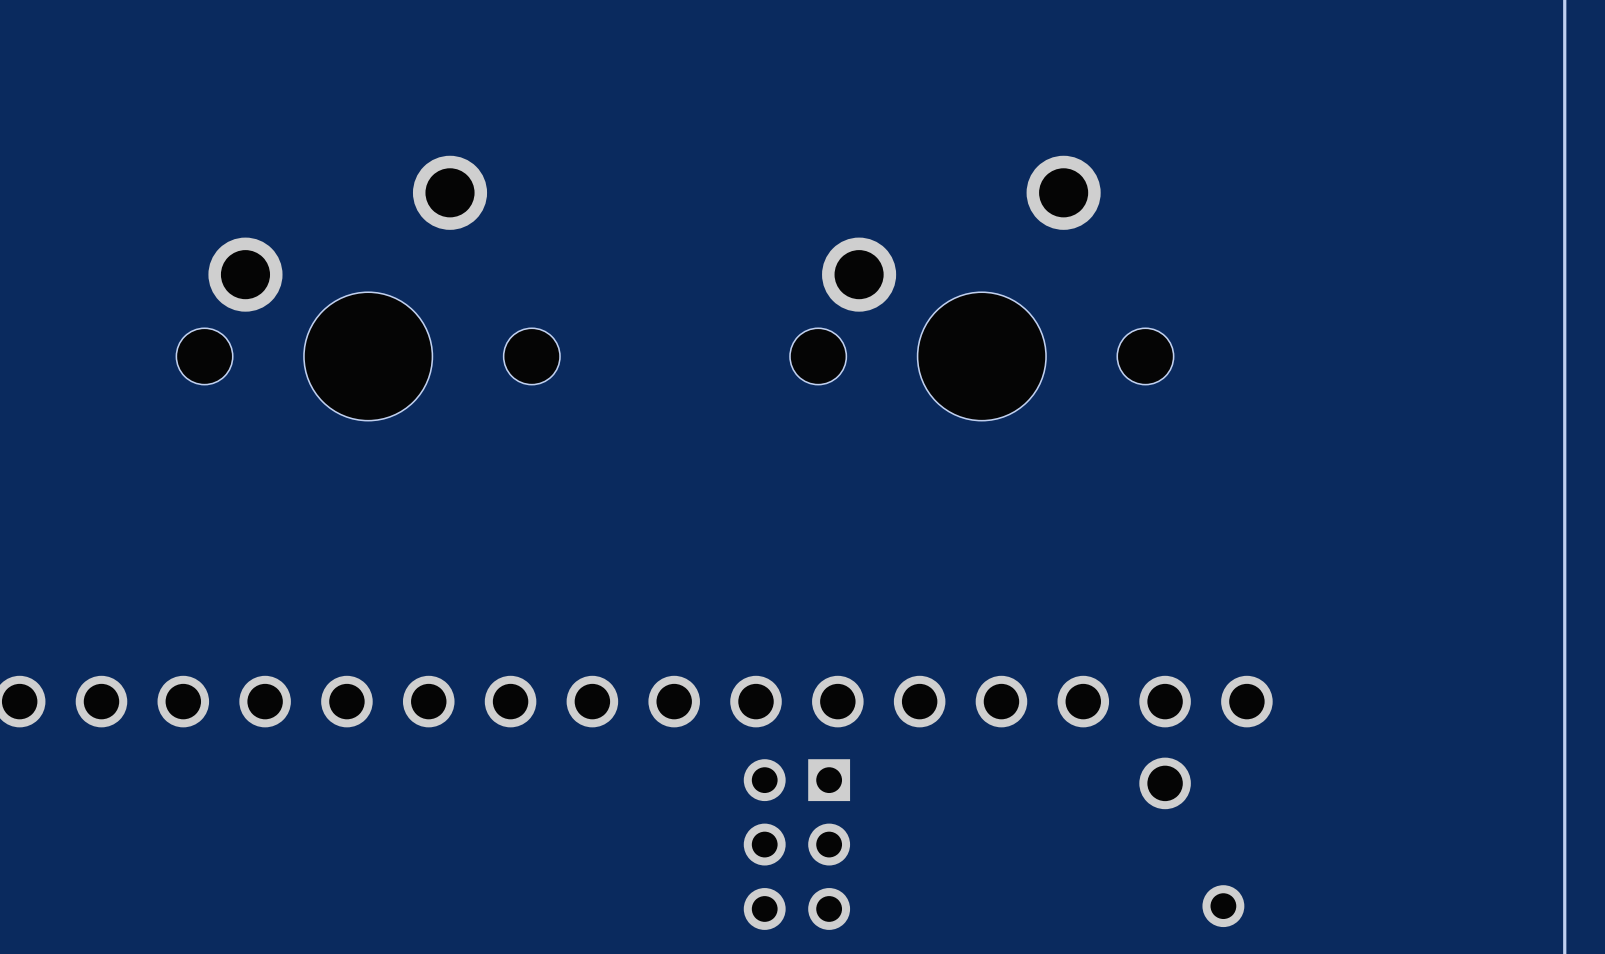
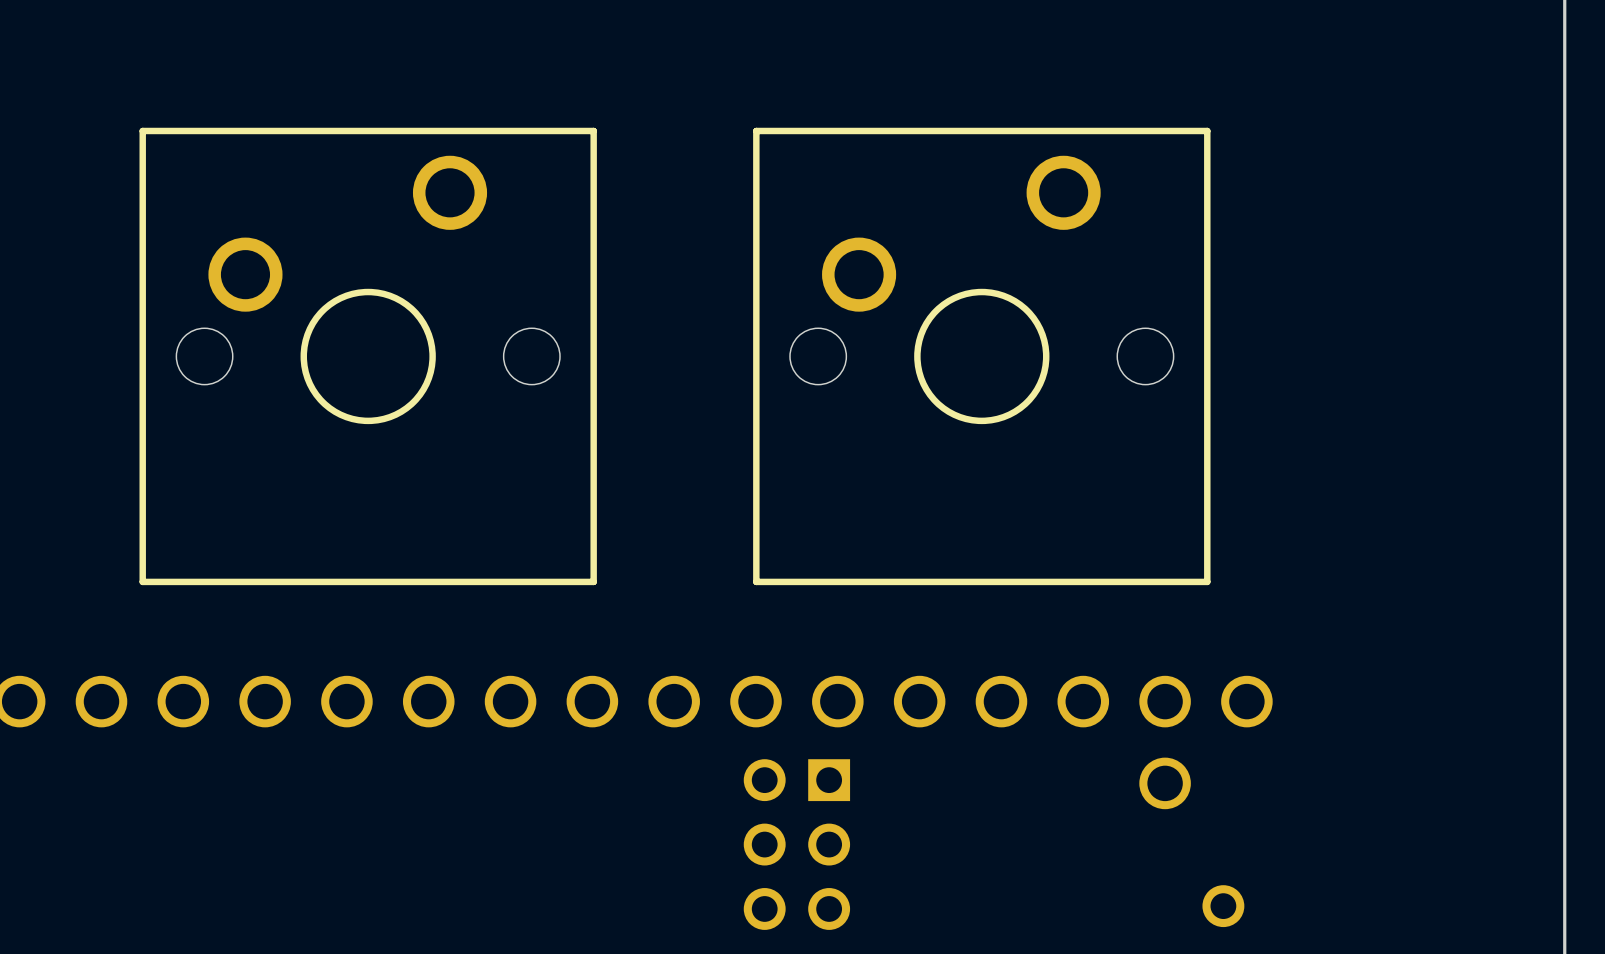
line: none -> (142, 130) (593, 130) (593, 581) (142, 581) (142, 130)
line: none -> (756, 130) (756, 581) (1207, 581) (1207, 130) (756, 130)
drawing: none -> [300, 288, 436, 425]
drawing: none -> [914, 288, 1050, 425]

